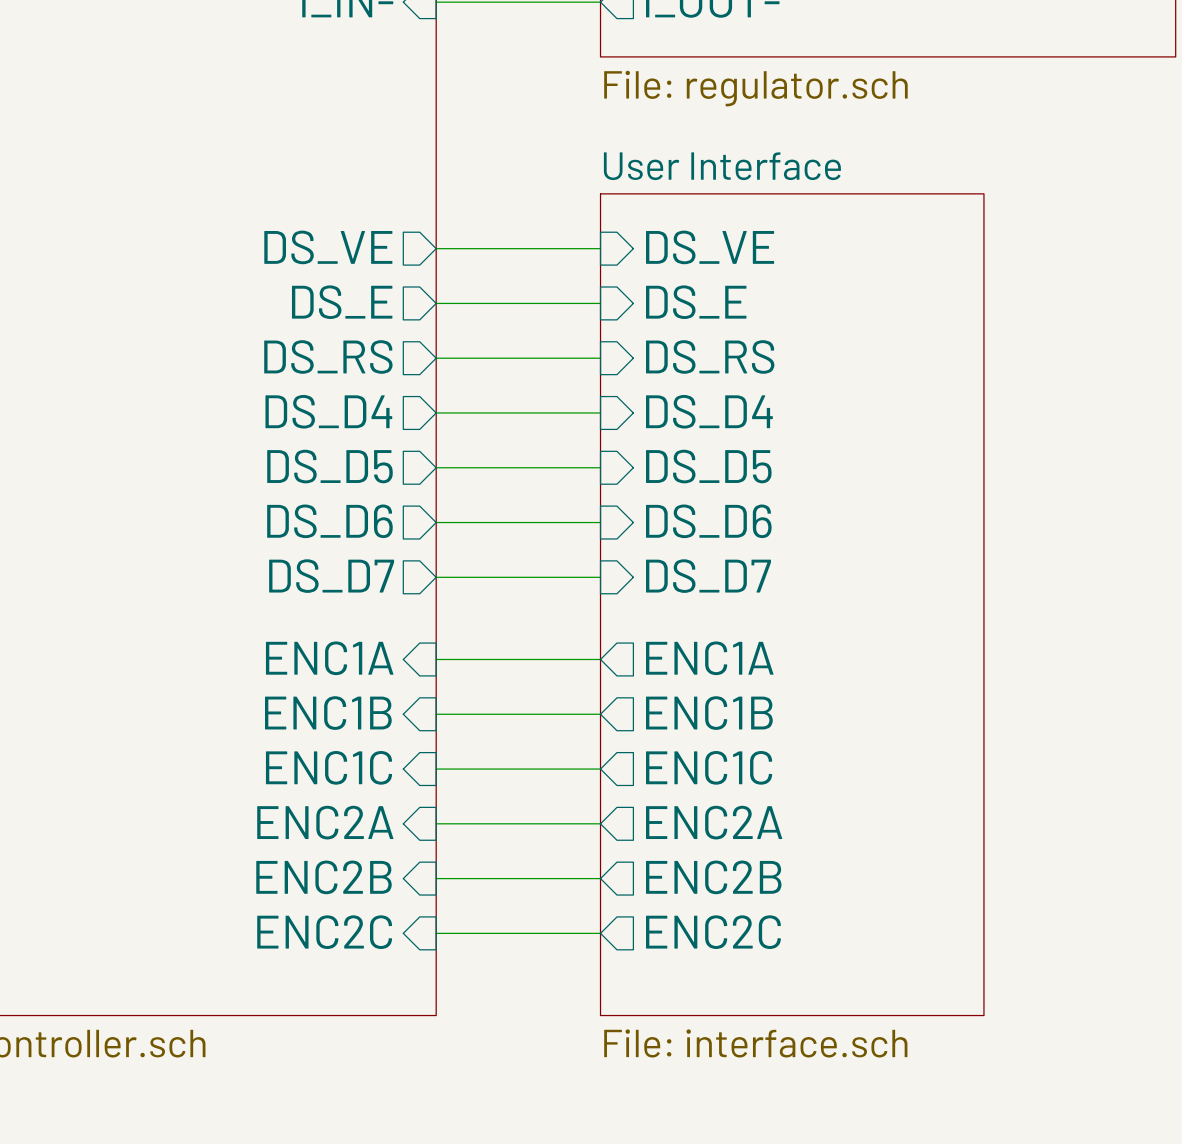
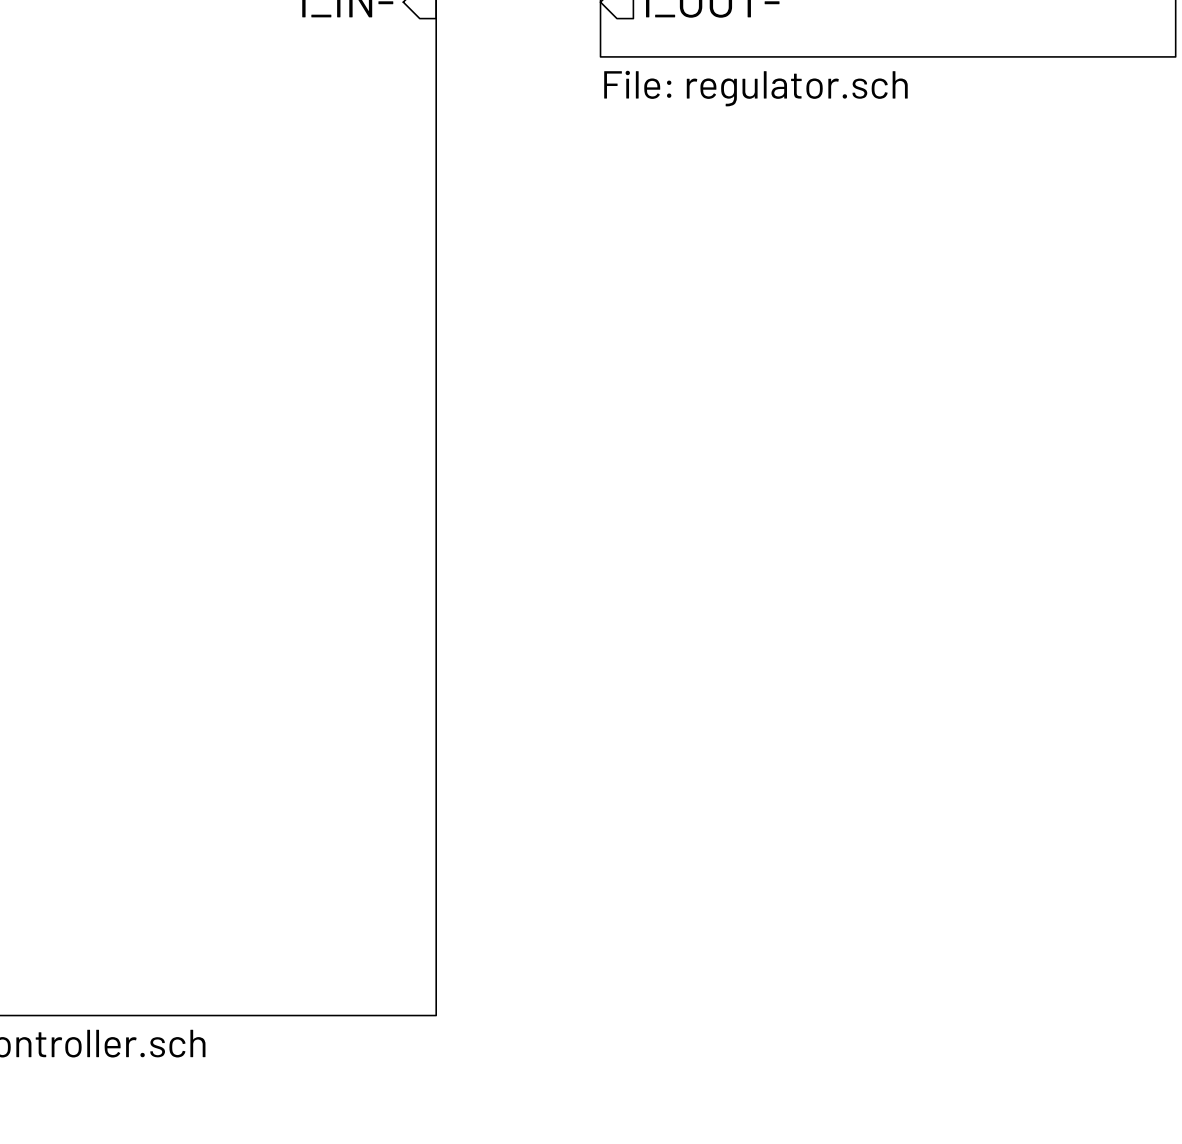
wire: (436, 2) (600, 2) -> none
sheet pin: DS_VE (328, 247) -> none
sheet pin: DS_VE (710, 247) -> none
wire: (436, 248) (600, 248) -> none
sheet pin: DS_E (342, 302) -> none
sheet pin: DS_E (696, 302) -> none
wire: (436, 303) (600, 303) -> none
sheet pin: DS_RS (328, 356) -> none
sheet pin: DS_RS (710, 356) -> none
wire: (436, 358) (600, 358) -> none
sheet pin: DS_D4 (328, 411) -> none
sheet pin: DS_D4 (709, 411) -> none
wire: (436, 412) (600, 412) -> none
sheet pin: DS_D5 (329, 466) -> none
sheet pin: DS_D5 (708, 466) -> none
wire: (436, 467) (600, 467) -> none
sheet pin: DS_D6 (329, 521) -> none
sheet pin: DS_D6 (708, 521) -> none
wire: (436, 522) (600, 522) -> none
sheet pin: DS_D7 (331, 576) -> none
sheet pin: DS_D7 (708, 576) -> none
wire: (436, 577) (600, 577) -> none
sheet User Interface: File: interface.sch (792, 604) -> none
sheet pin: ENC1A (329, 658) -> none
sheet pin: ENC1A (709, 658) -> none
wire: (436, 659) (600, 659) -> none
sheet pin: ENC1B (328, 713) -> none
sheet pin: ENC1B (709, 713) -> none
wire: (436, 714) (600, 714) -> none
sheet pin: ENC1C (329, 767) -> none
sheet pin: ENC1C (709, 767) -> none
wire: (436, 769) (600, 769) -> none
sheet pin: ENC2A (325, 822) -> none
sheet pin: ENC2A (714, 822) -> none
wire: (436, 823) (600, 823) -> none
sheet pin: ENC2B (324, 877) -> none
sheet pin: ENC2B (713, 877) -> none
wire: (436, 878) (600, 878) -> none
sheet pin: ENC2C (324, 932) -> none
sheet pin: ENC2C (713, 932) -> none
wire: (436, 933) (600, 933) -> none

